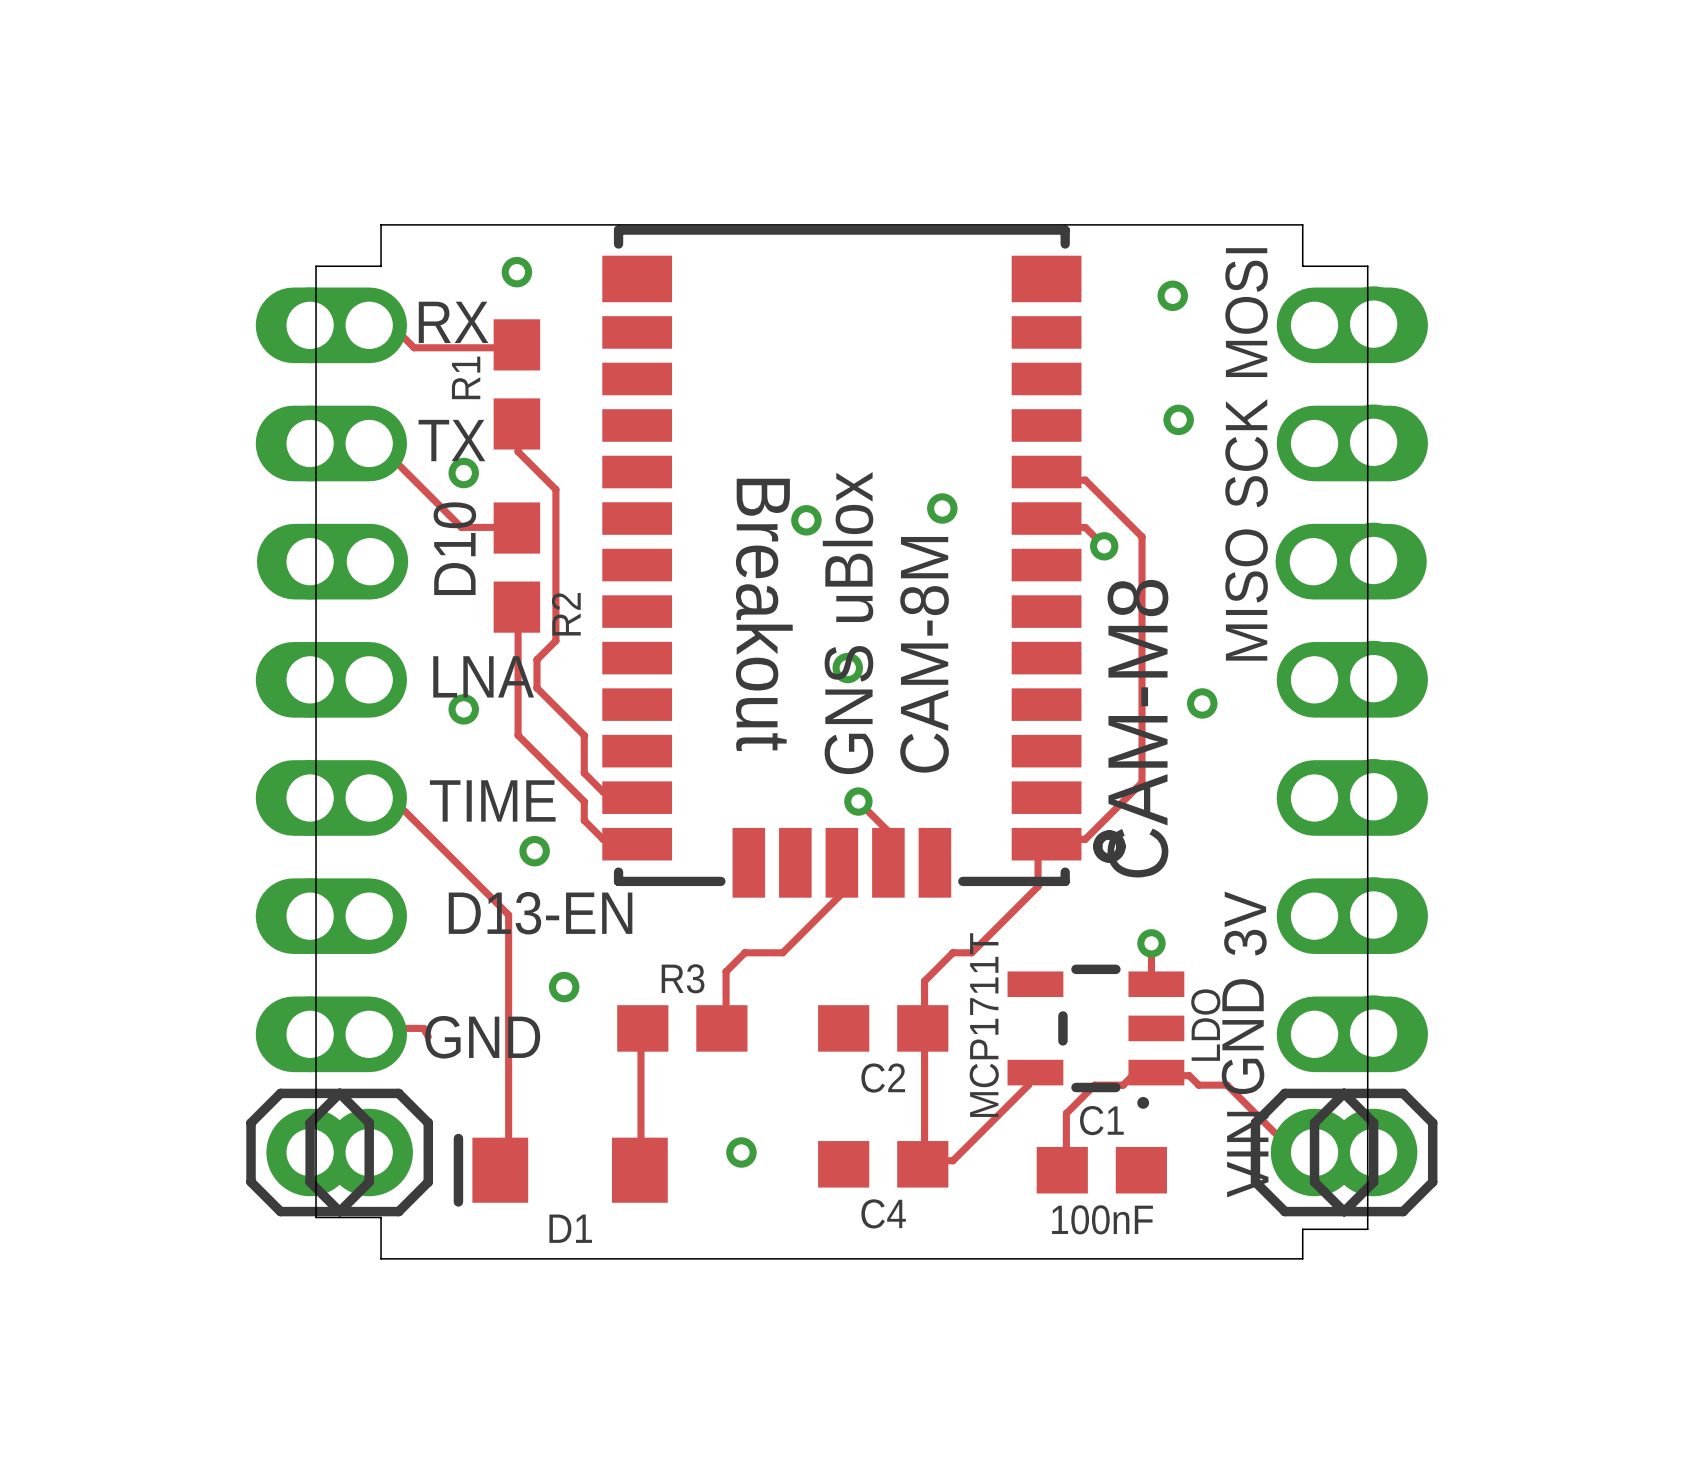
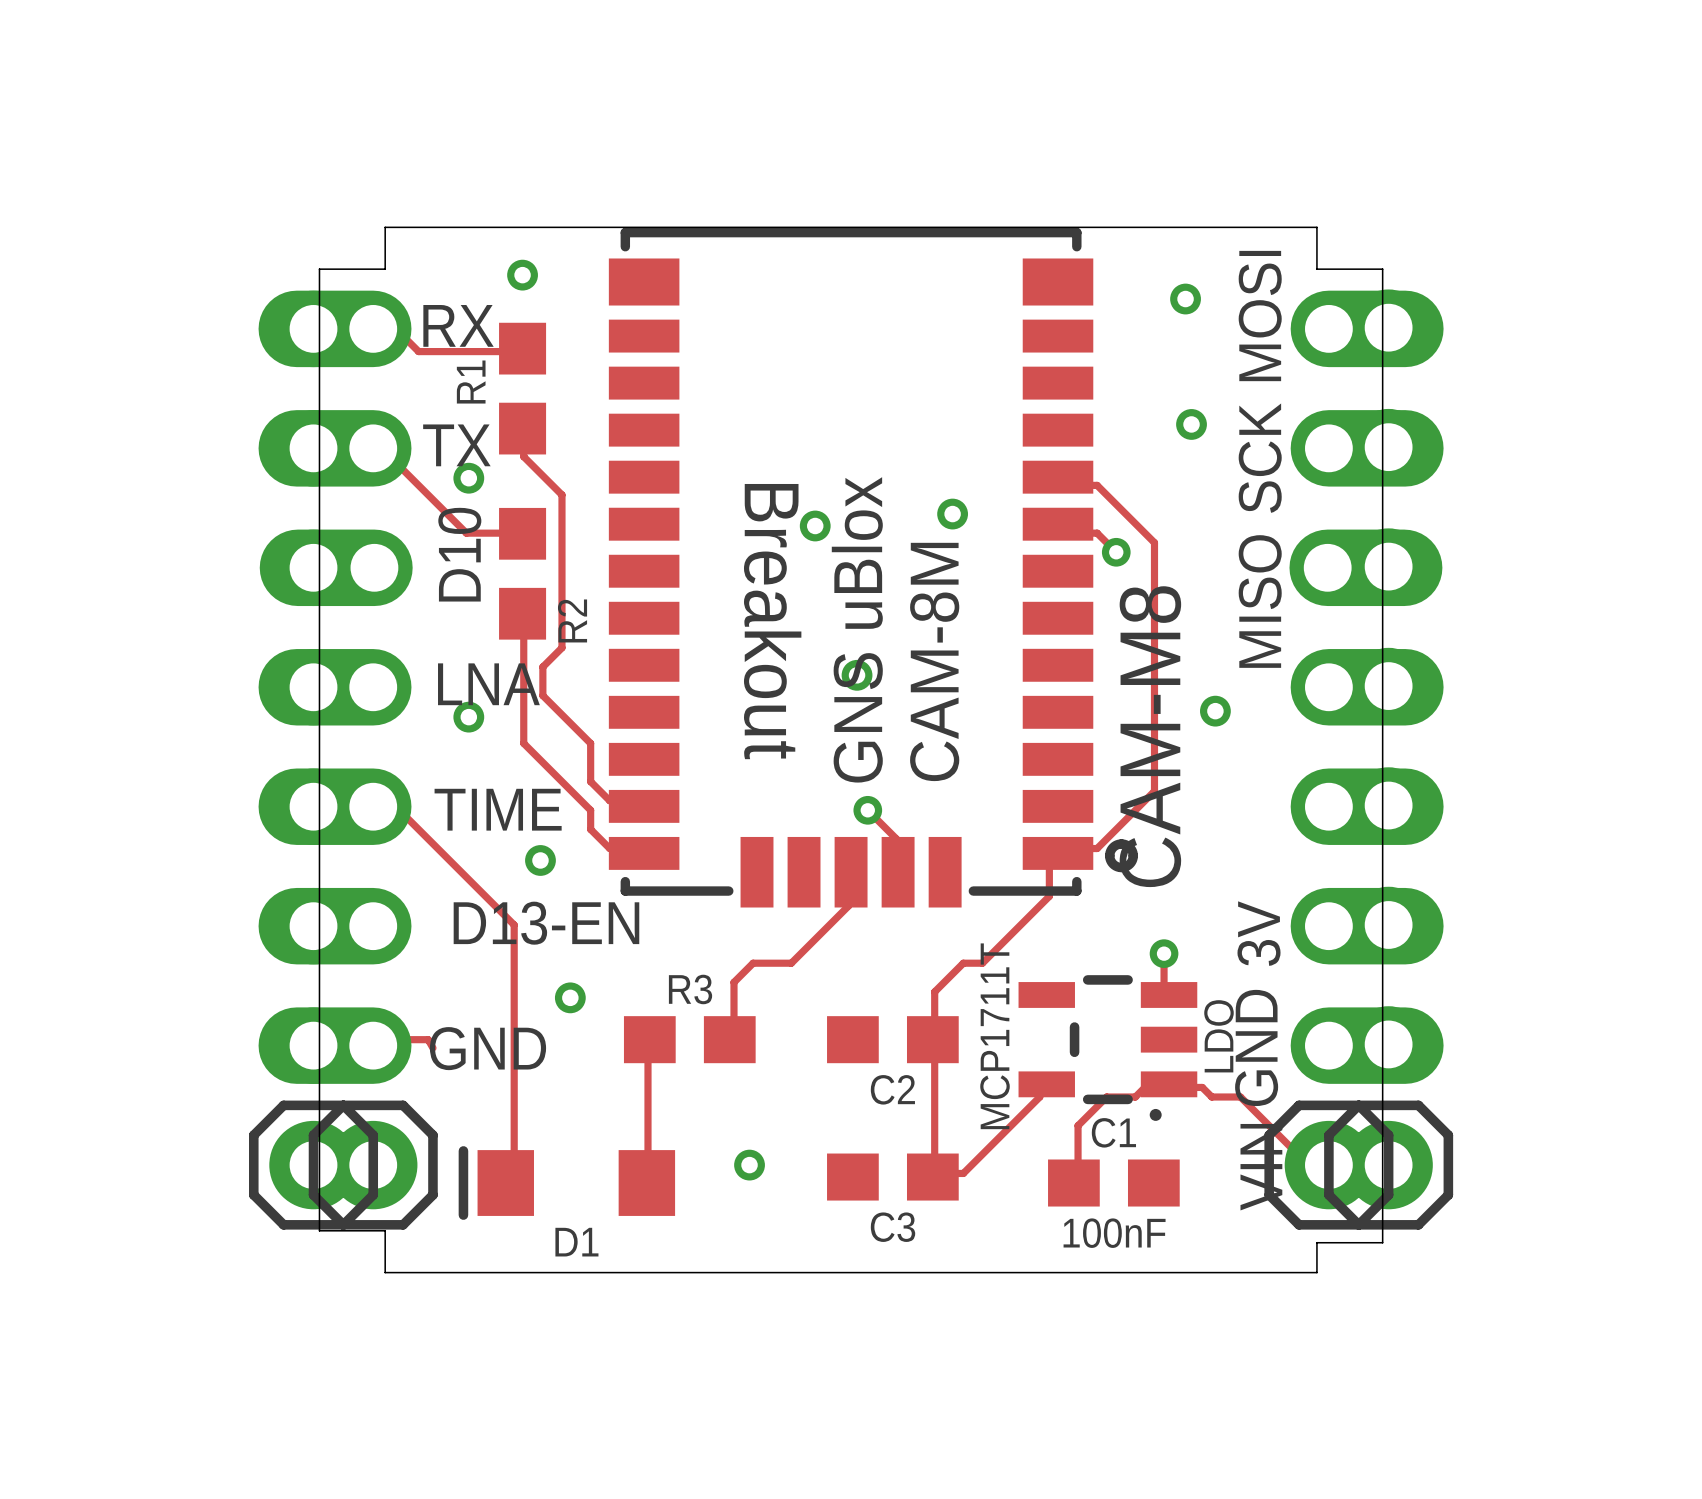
C4 name: C4 (883, 1213) -> C3 (893, 1227)

